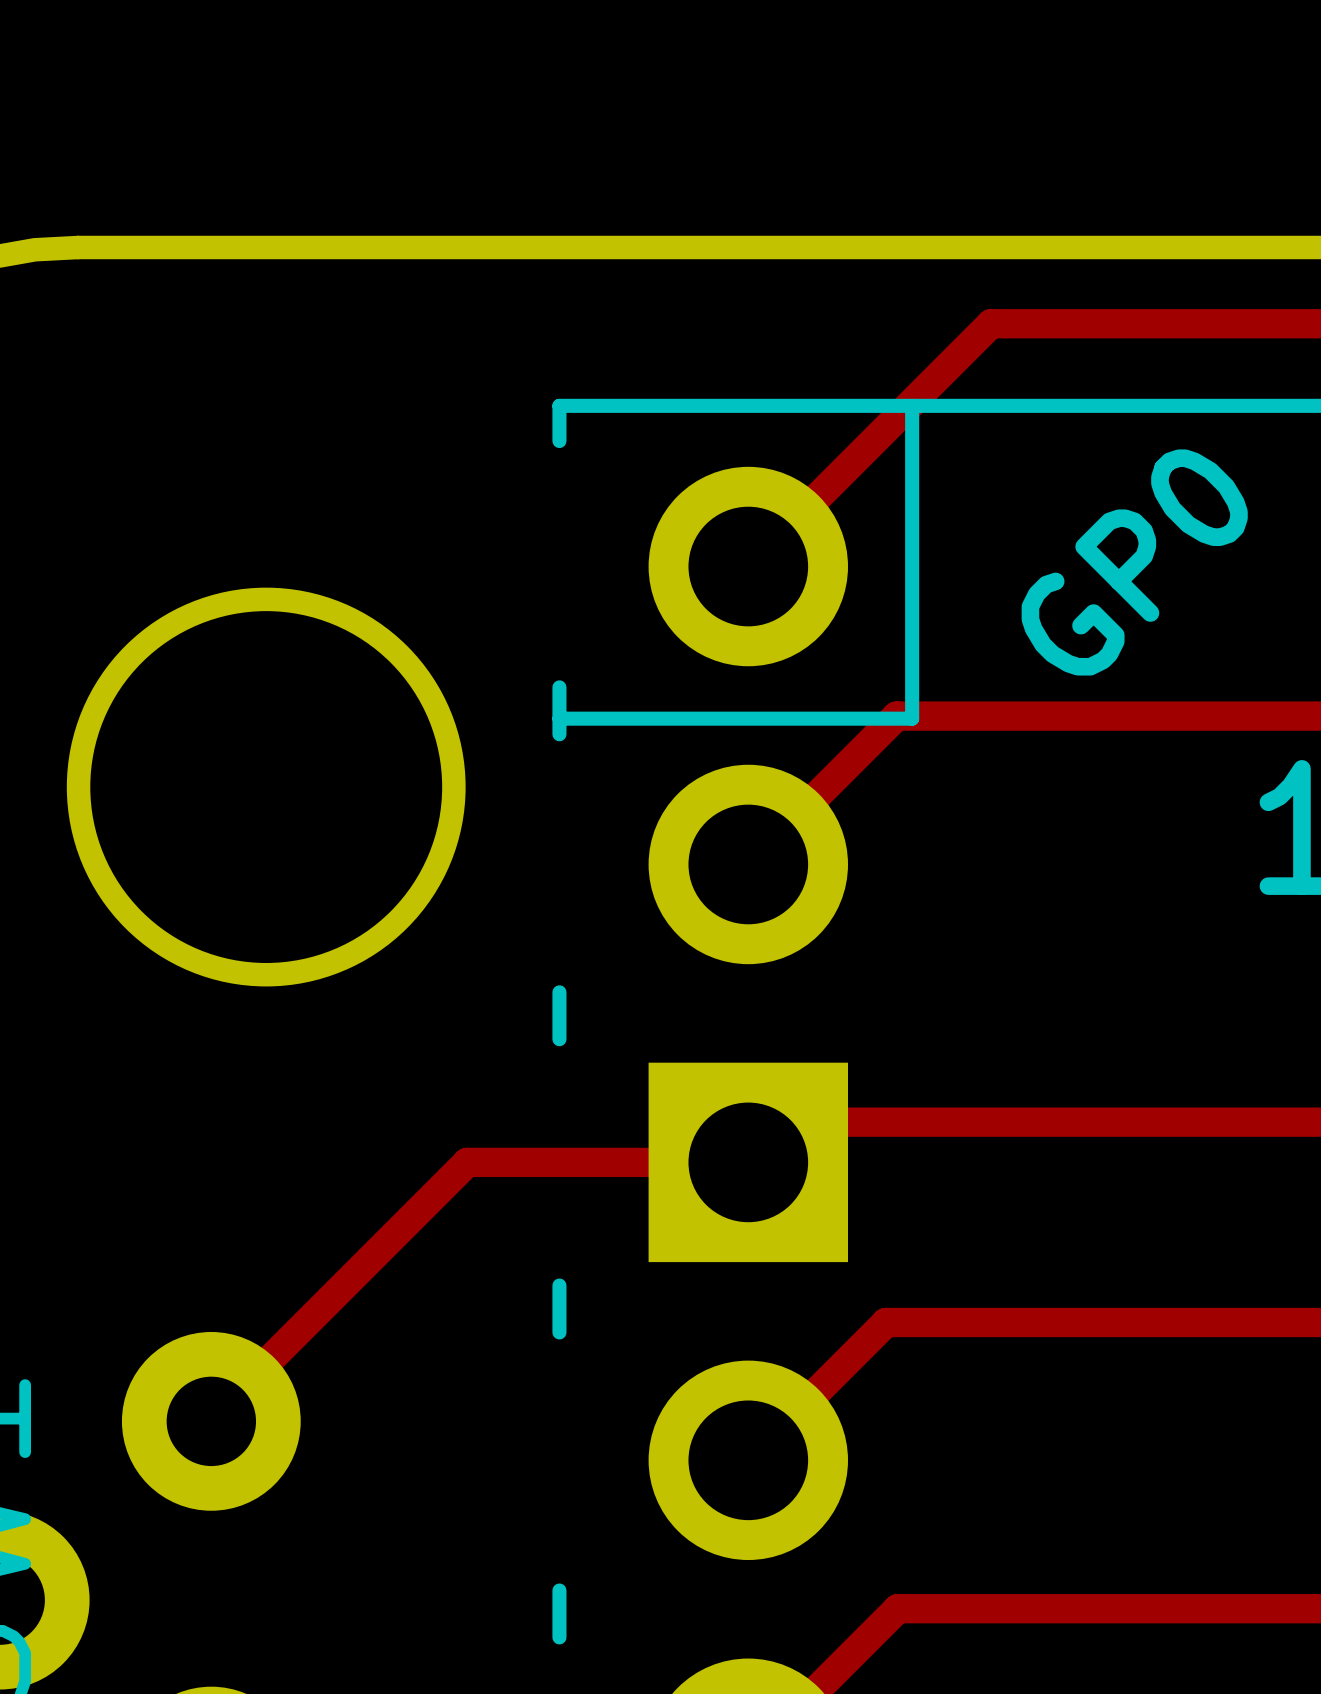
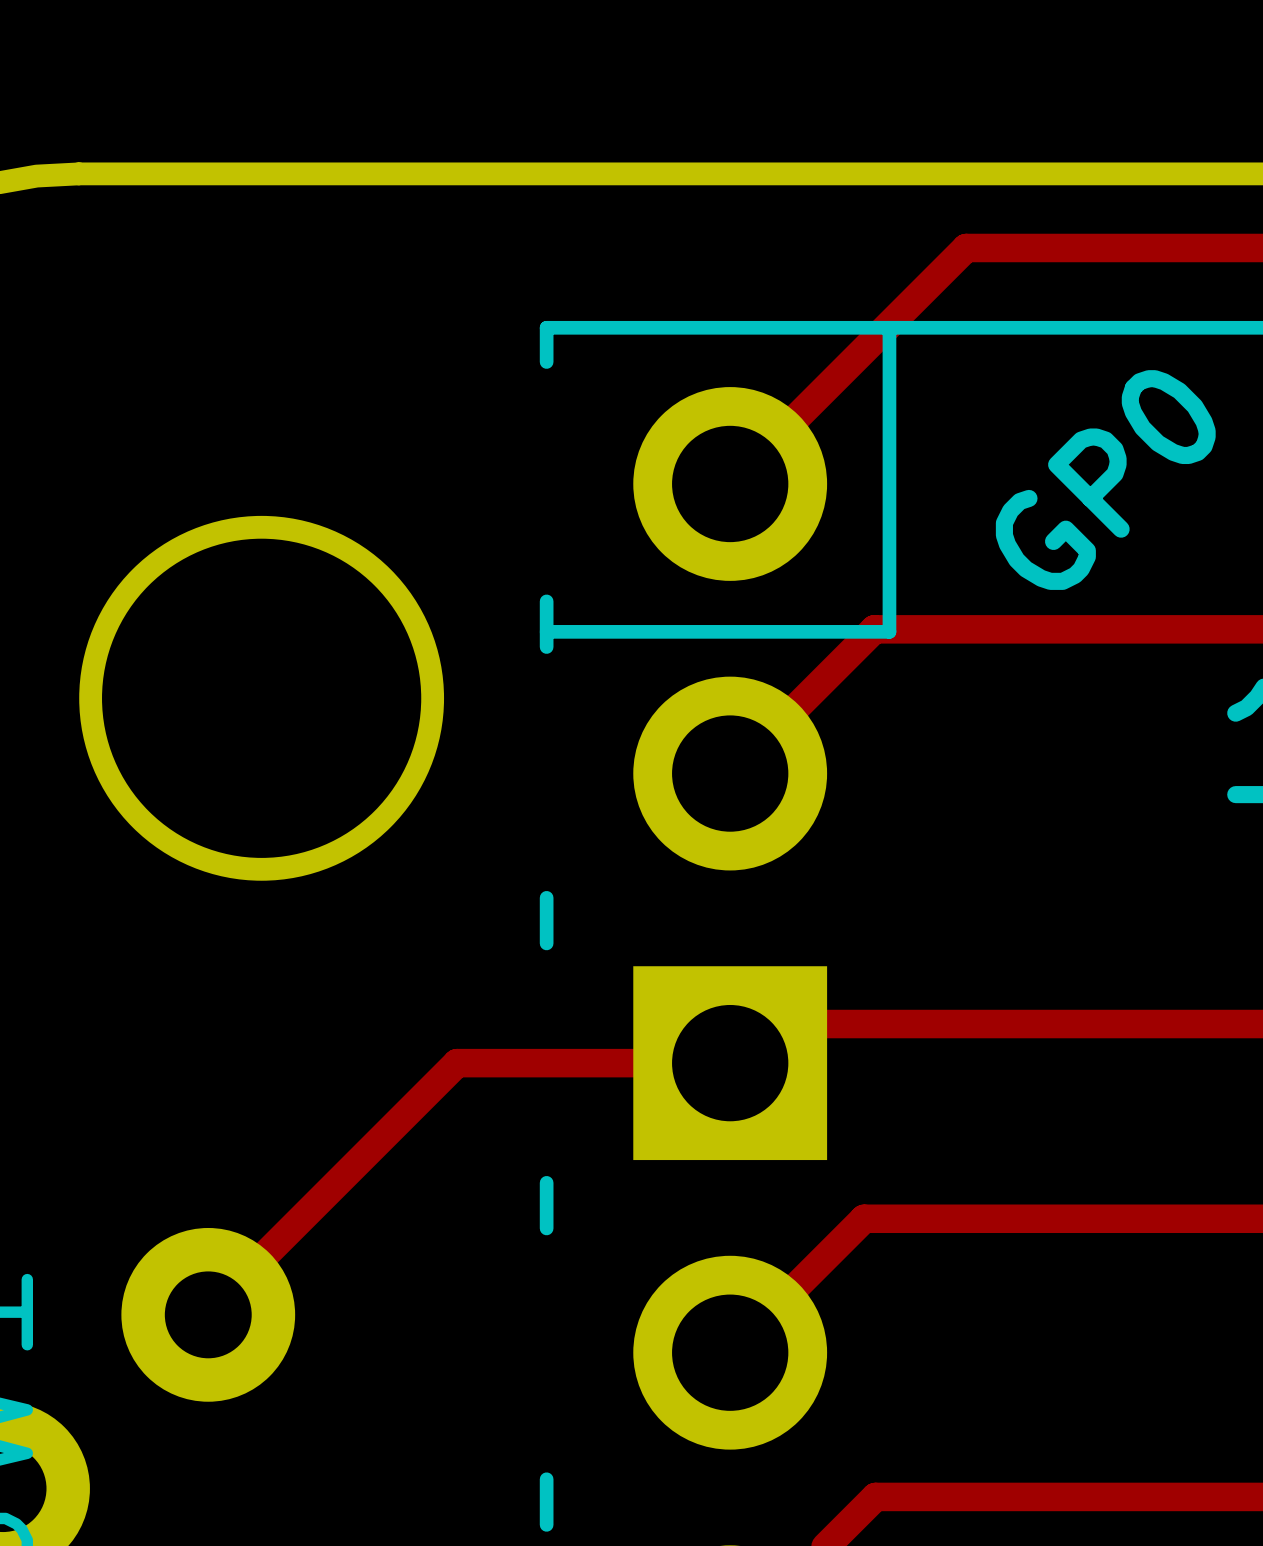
round board edge size: [66, 587, 466, 987] -> [79, 515, 445, 881]

